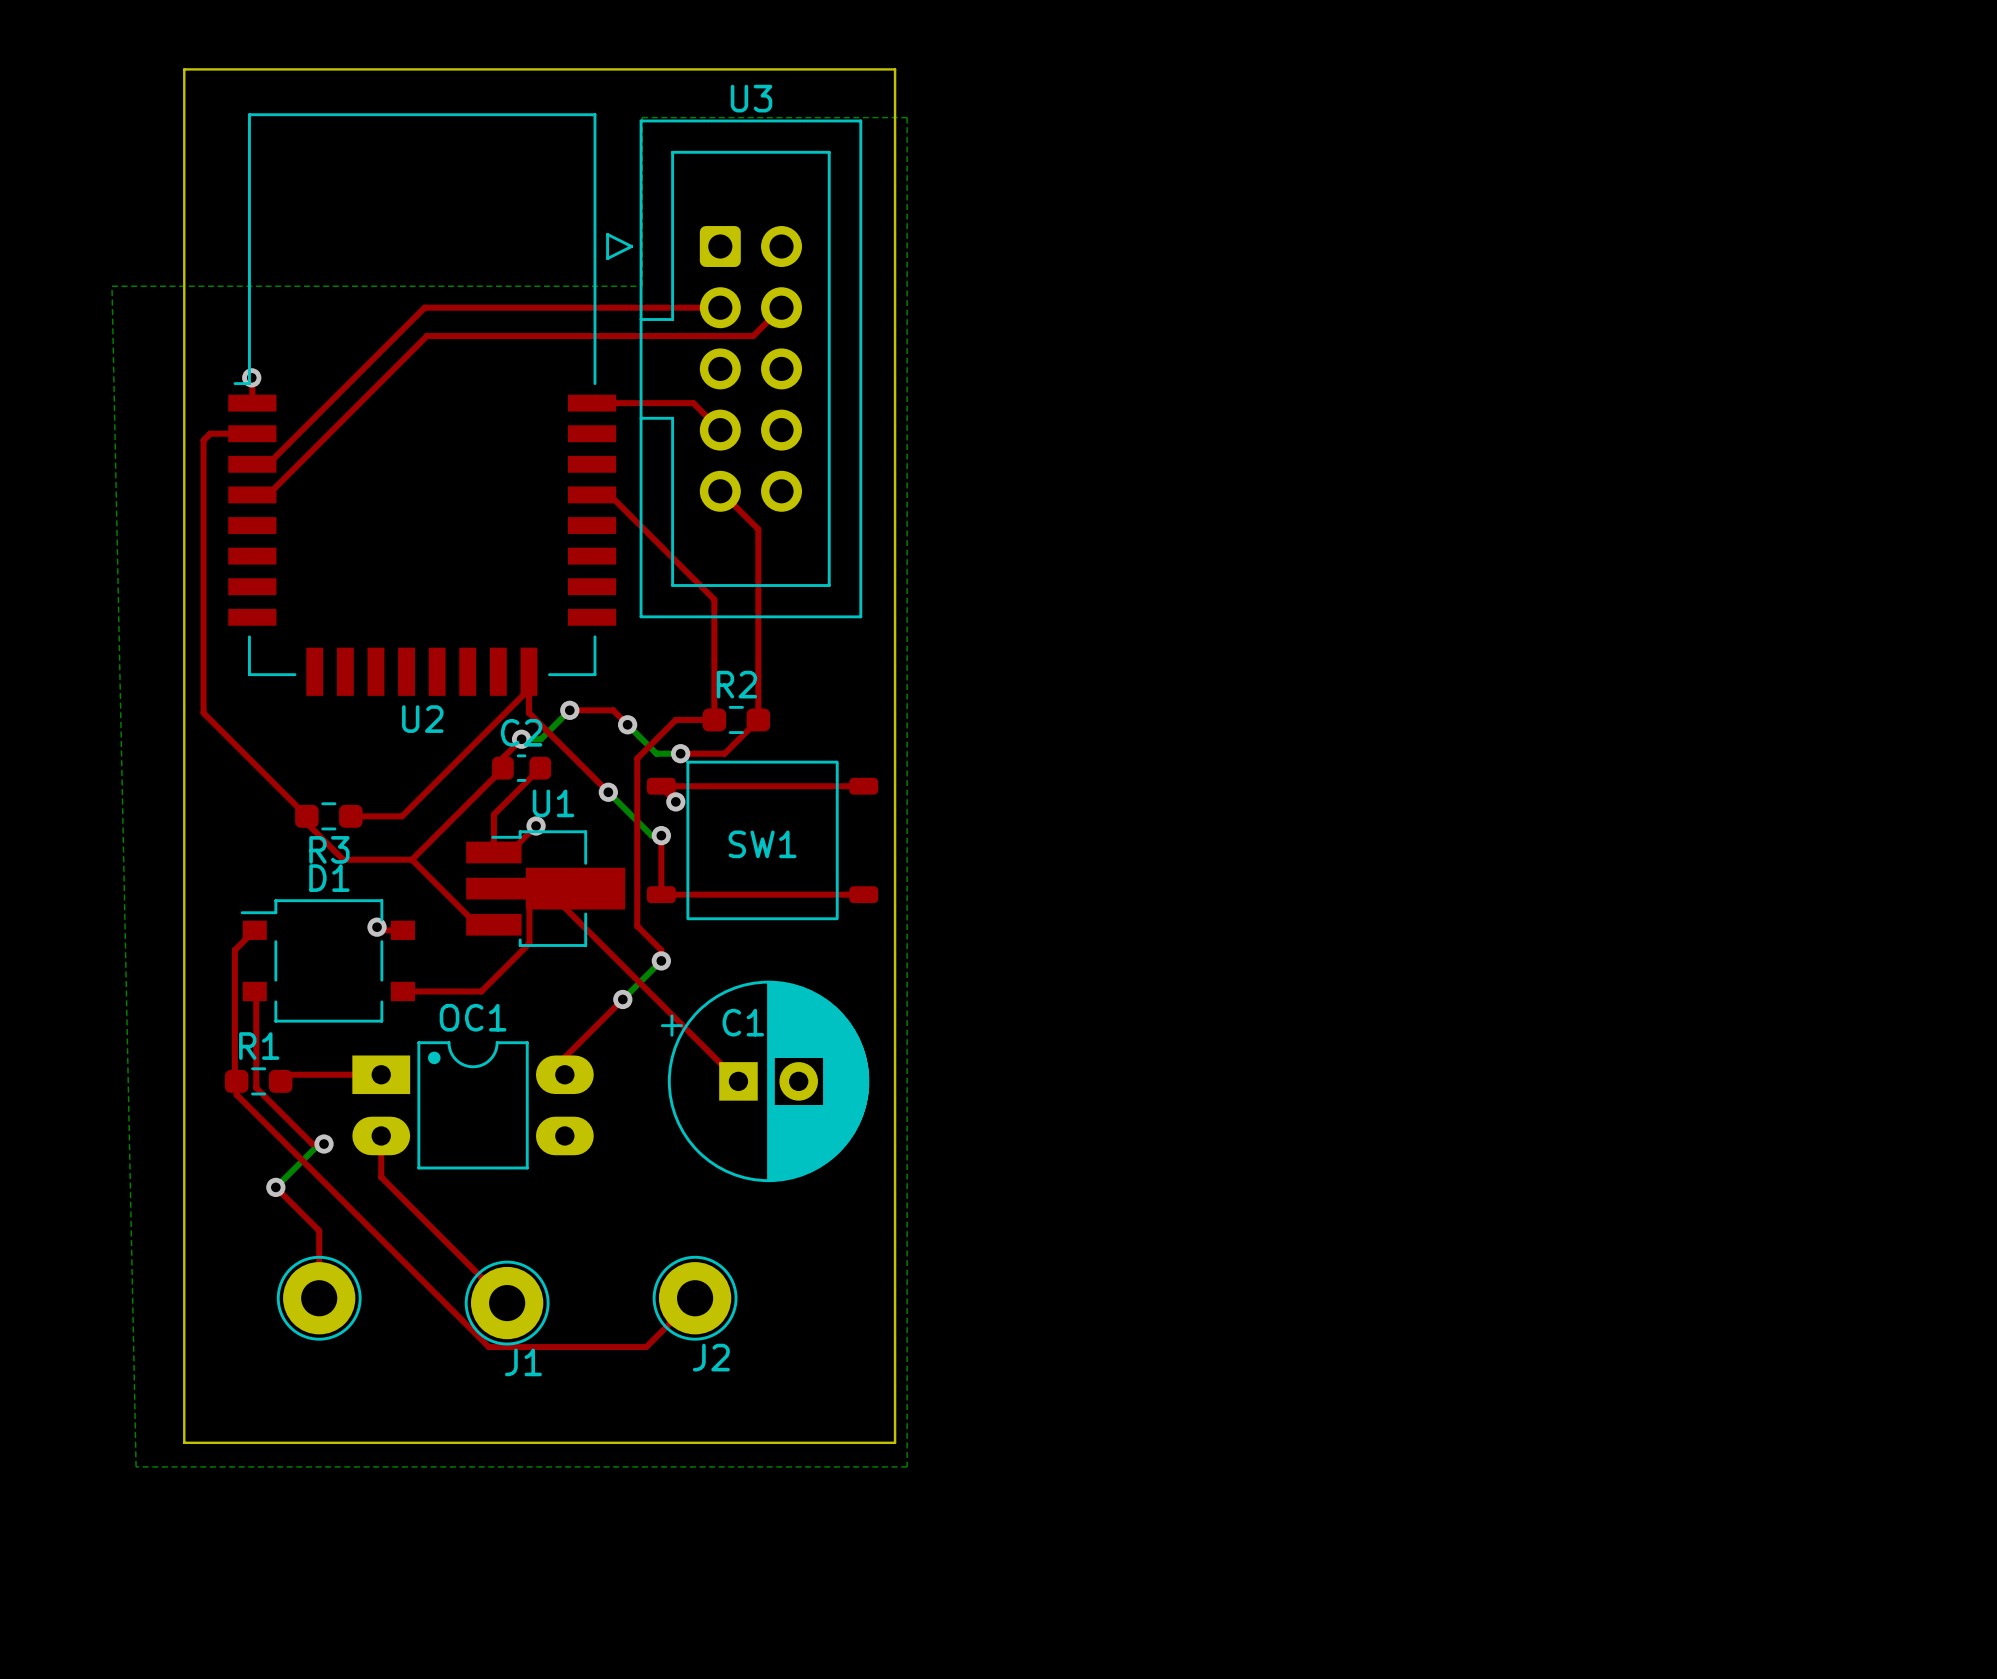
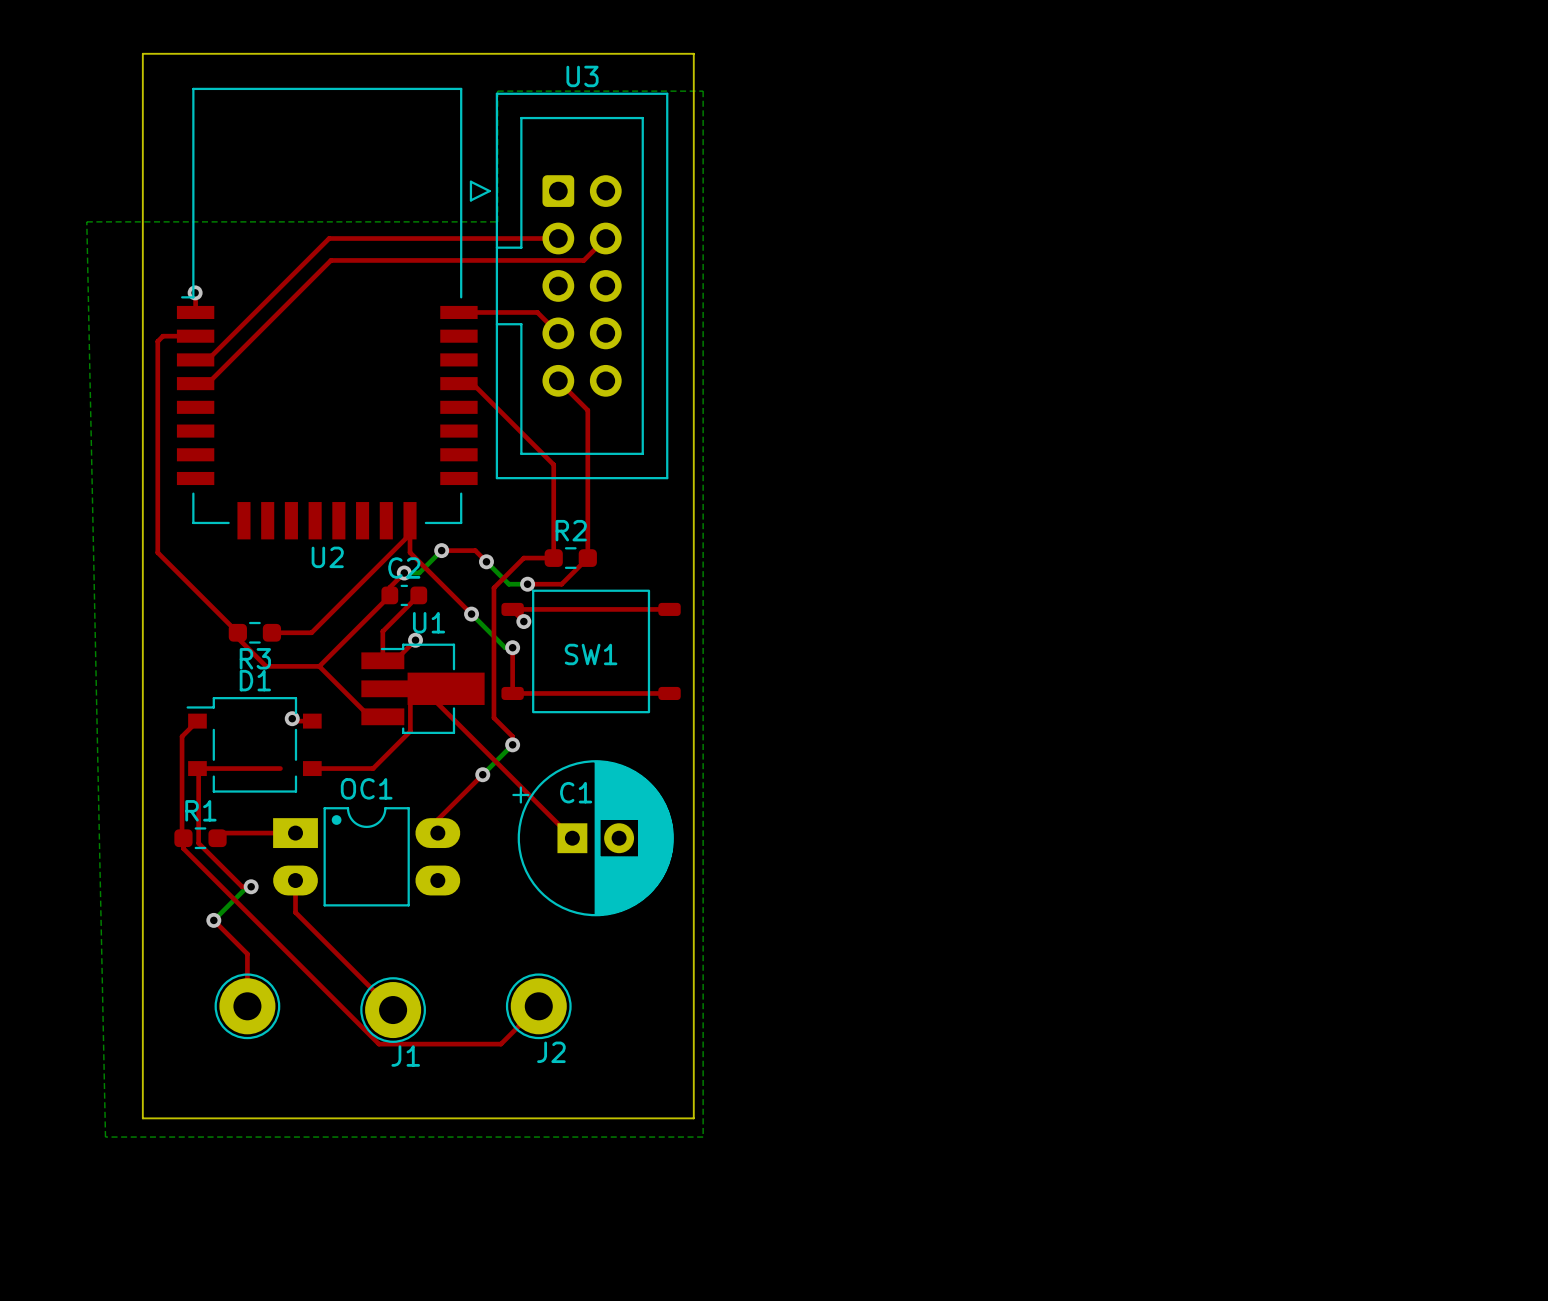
top track: none -> (197, 768) (280, 768)

